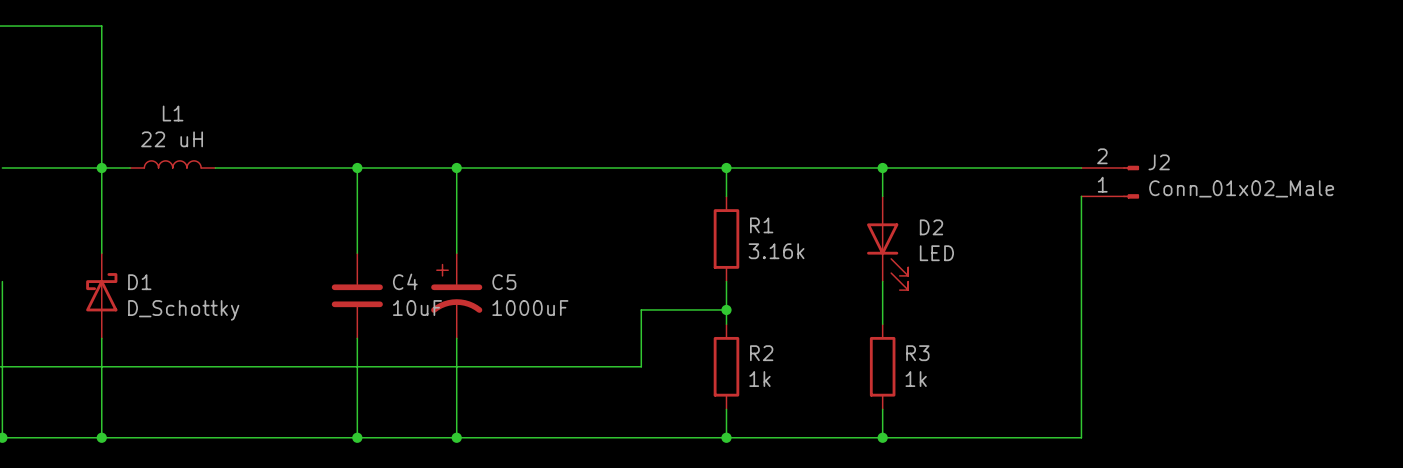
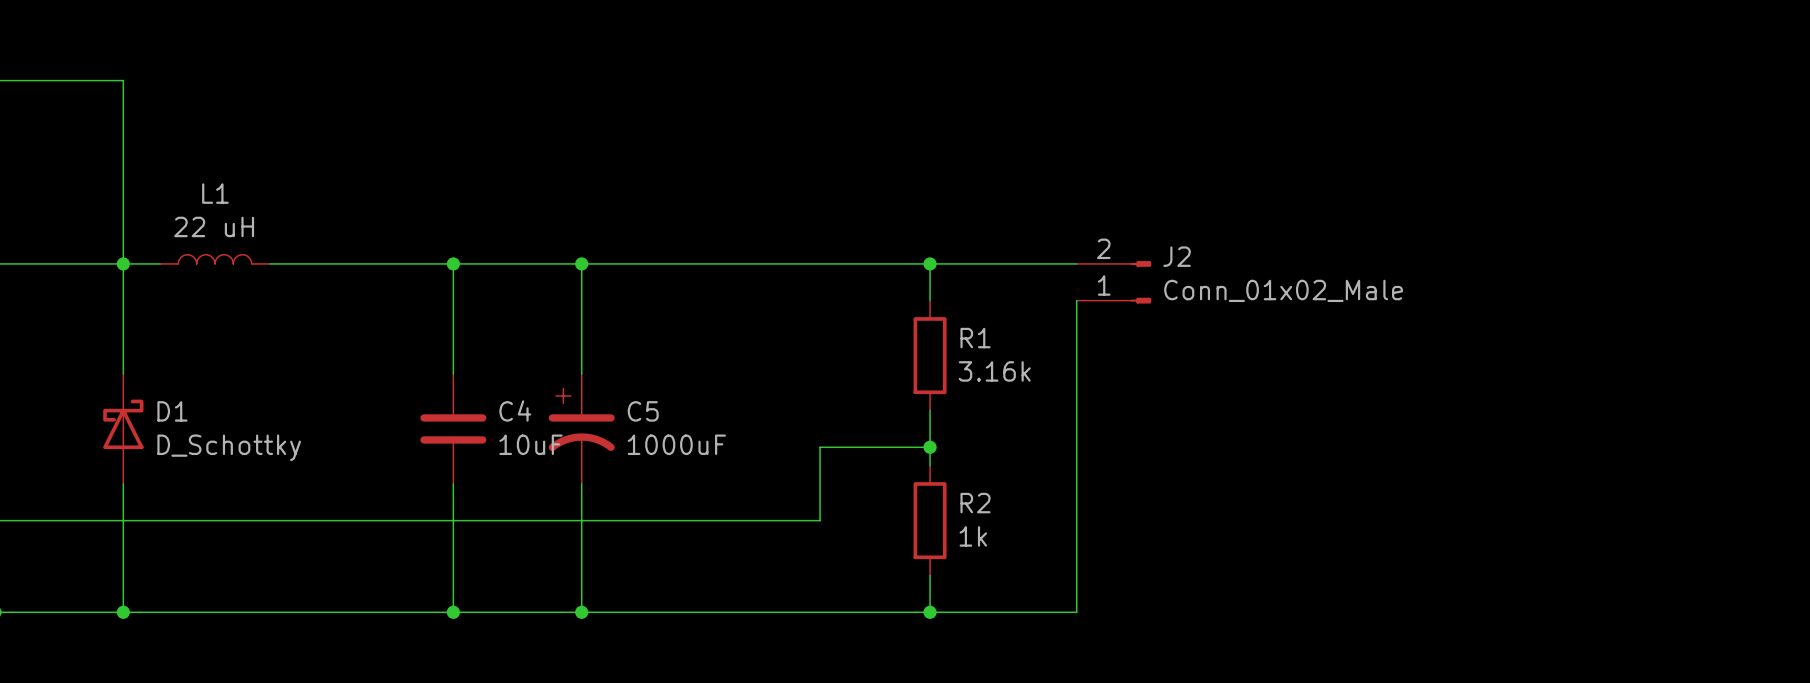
wire: (840, 168) (1081, 168) -> none
wire: (882, 168) (882, 196) -> none
junction: (882, 168) -> none
J2 position: (1110, 182) -> (1113, 282)
wire: (1081, 196) (1081, 437) (840, 437) -> (1076, 300) (1076, 612)
D2: LED (887, 243) -> none
wire: (882, 281) (882, 324) -> none
R3: 1k (882, 366) -> none
wire: (882, 409) (882, 437) -> none
junction: (882, 437) -> none

